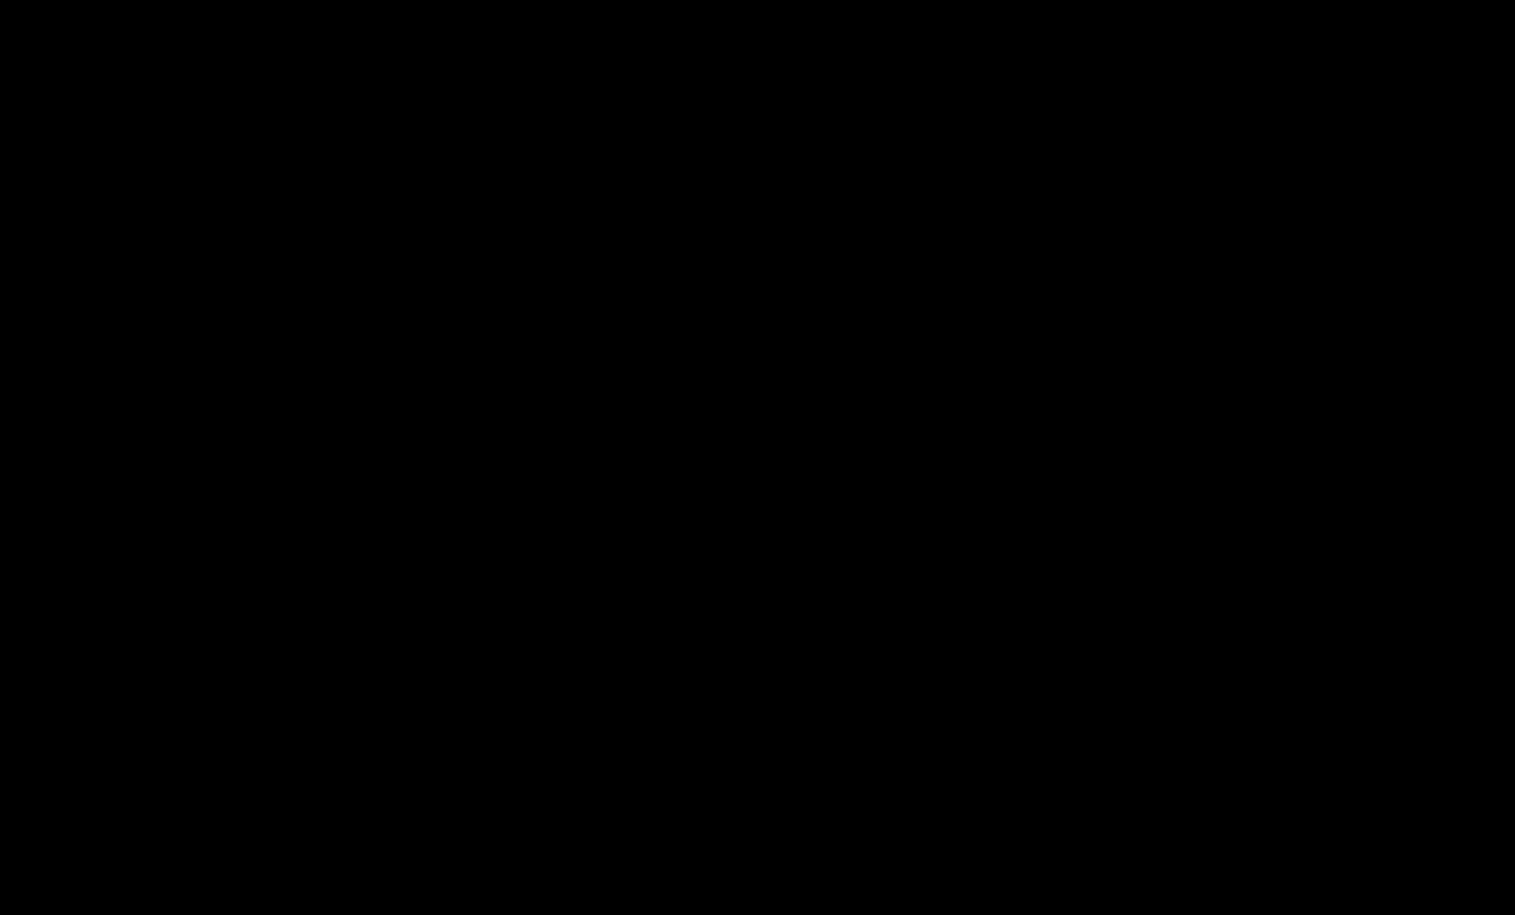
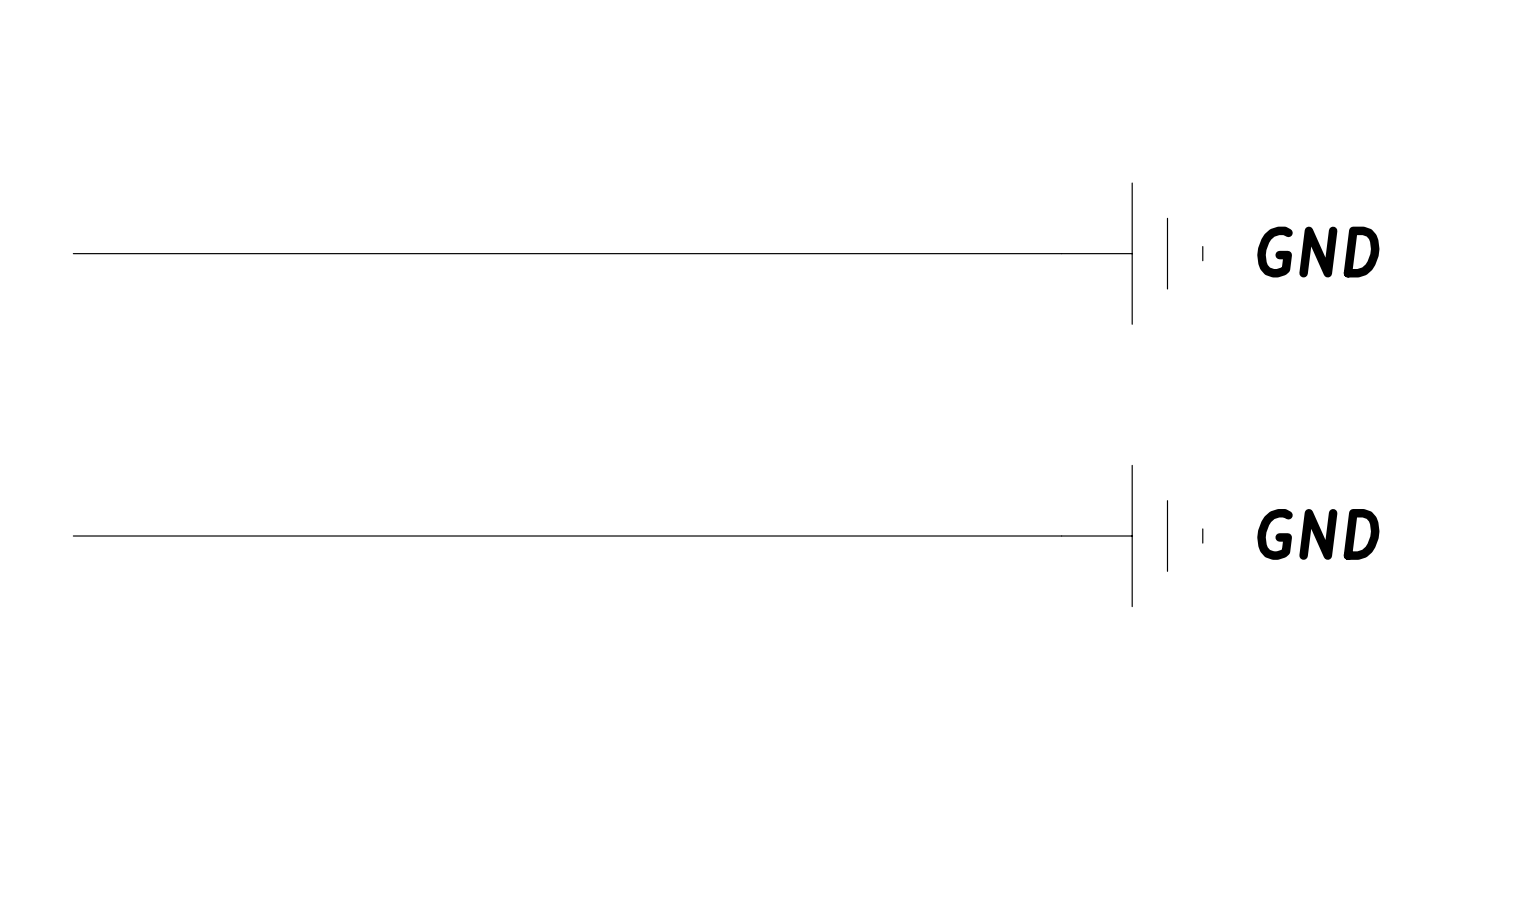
wire: none -> (73, 253) (1061, 253)
power symbol: none -> GND (1132, 253)
wire: none -> (73, 536) (1061, 536)
power symbol: none -> GND (1132, 536)

